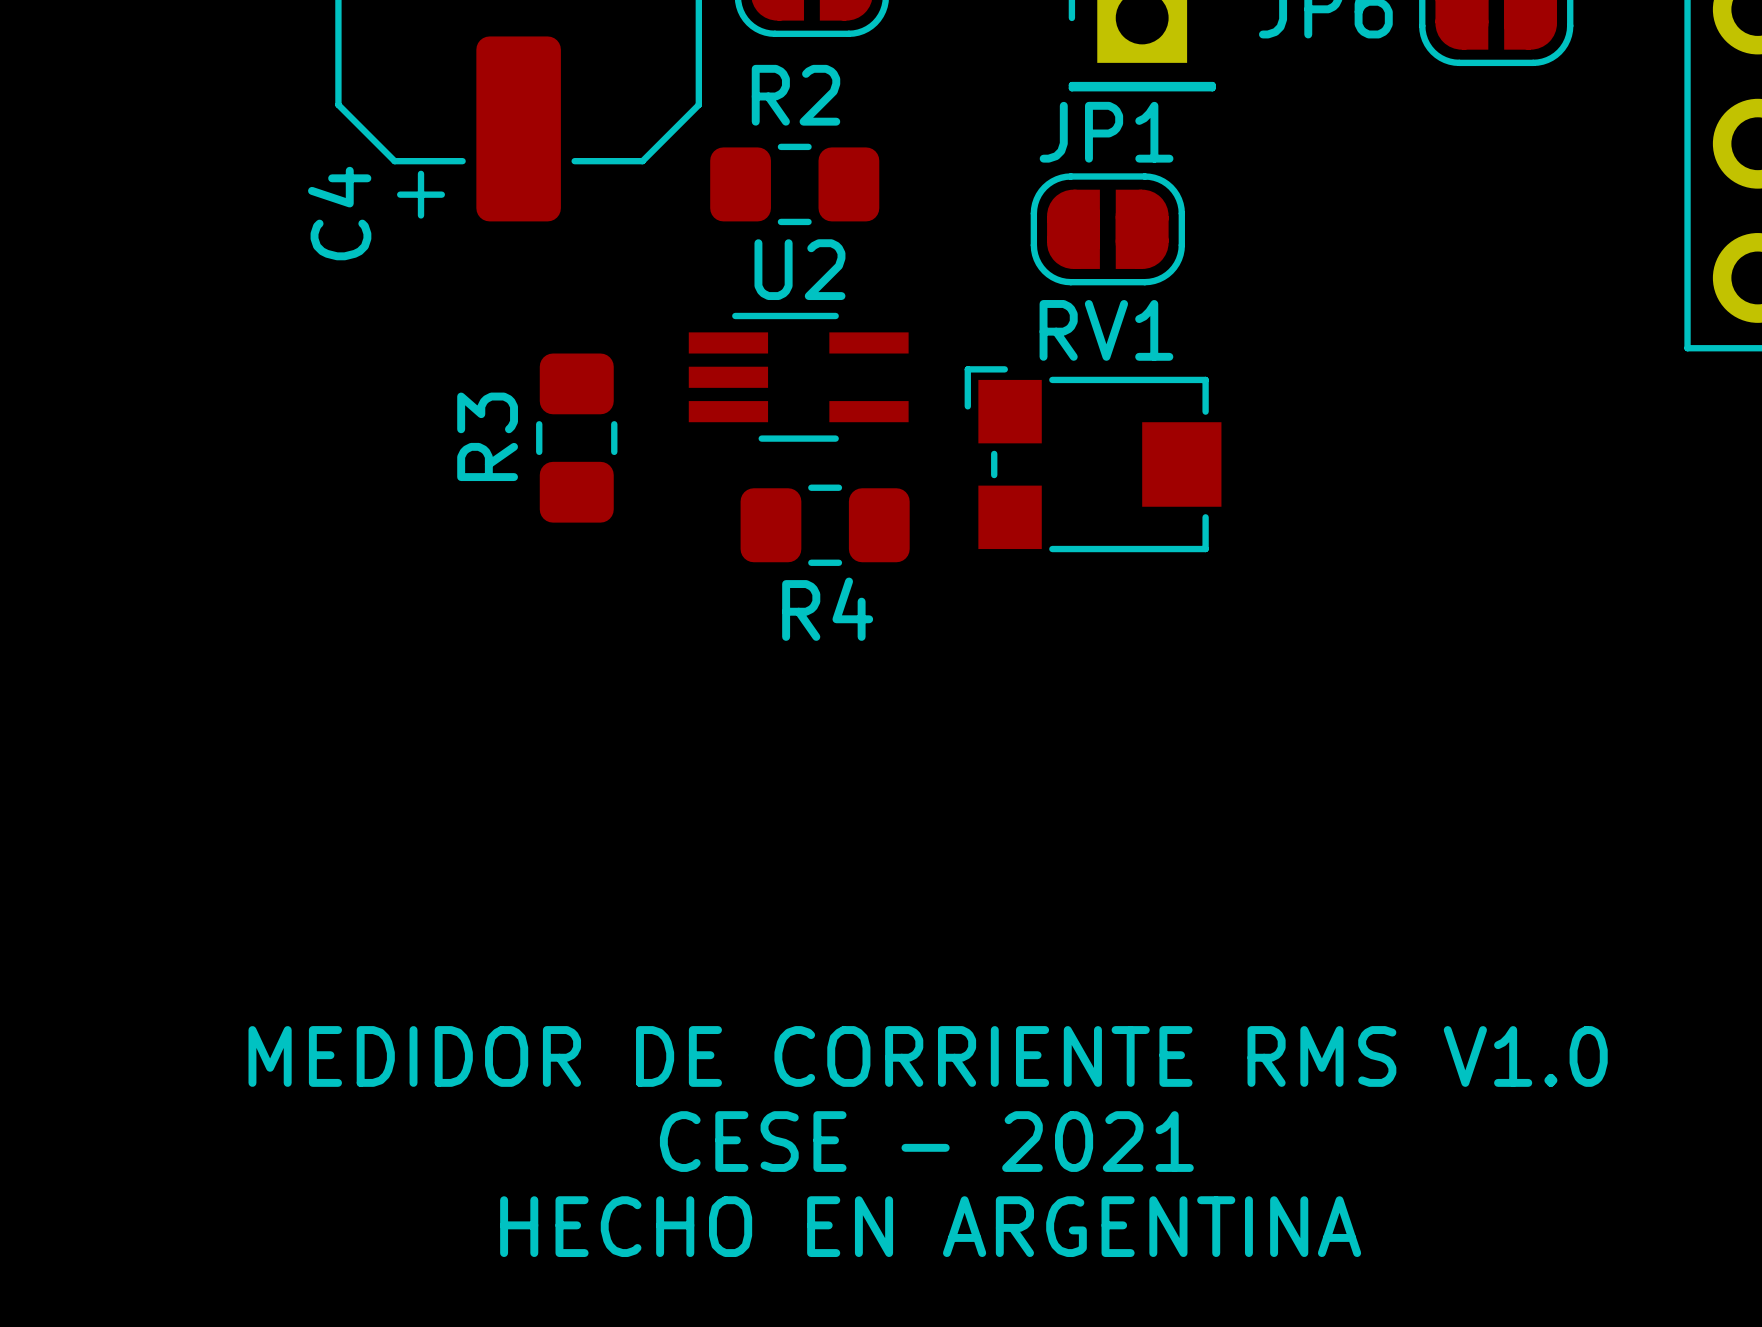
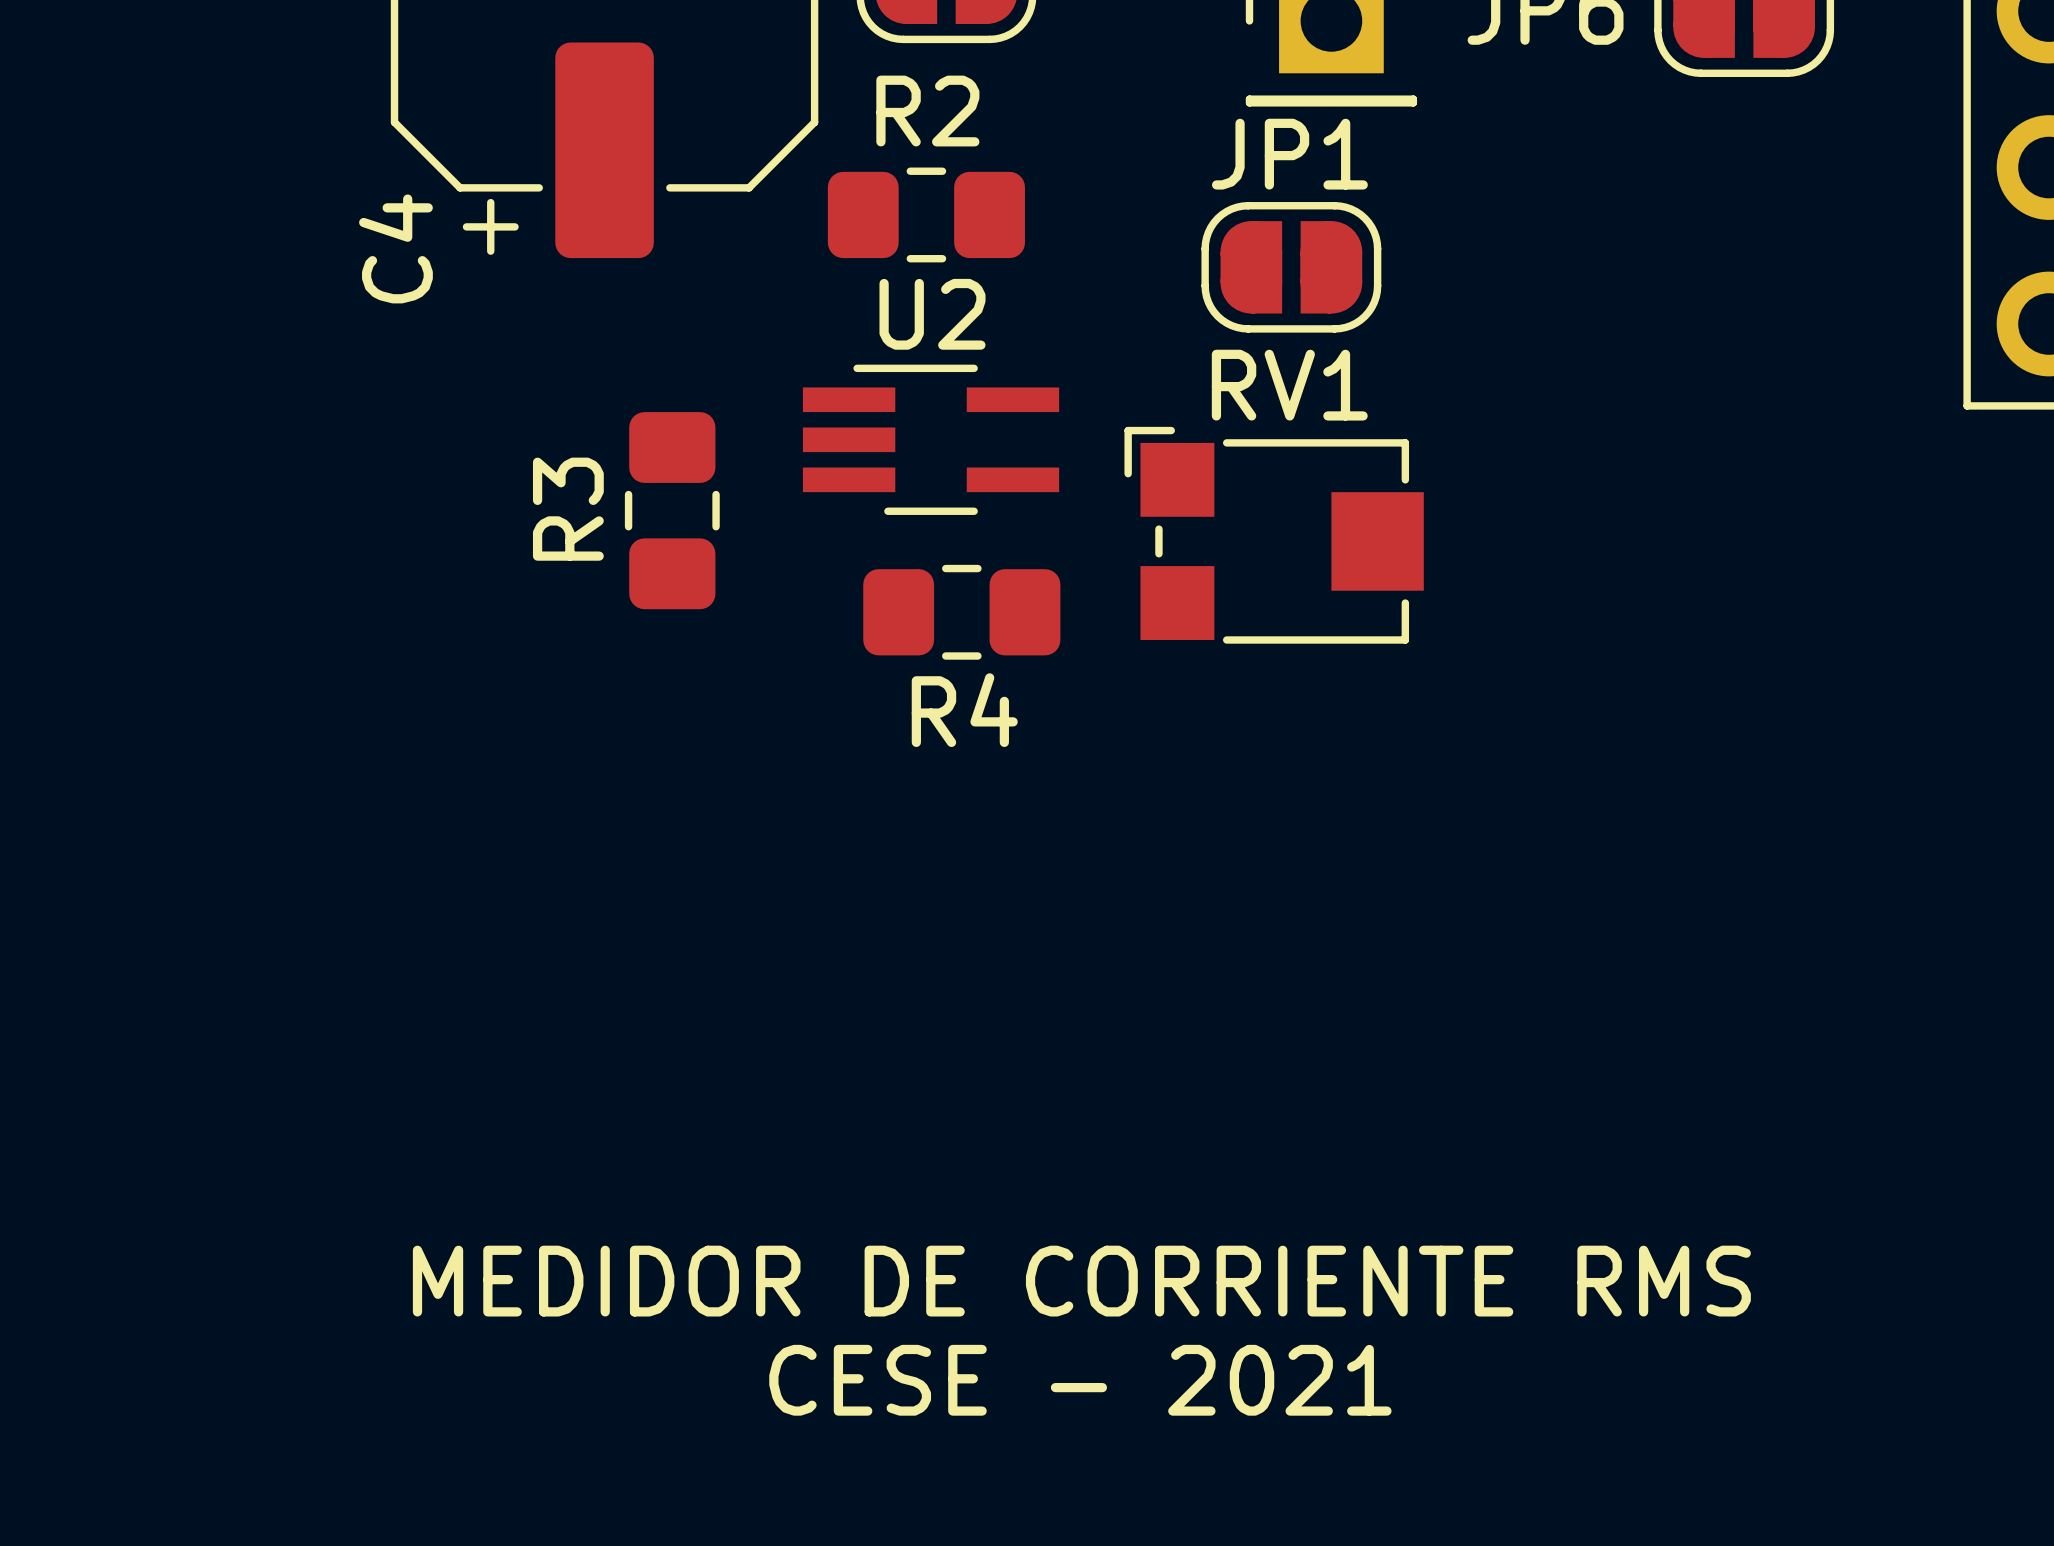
text: MEDIDOR DE CORRIENTE RMS V1.0 (928, 1056) -> MEDIDOR DE CORRIENTE RMS (1081, 1281)
text position: CESE - 2021 (926, 1141) -> CESE - 2021 (1080, 1380)
text: HECHO EN ARGENTINA (930, 1226) -> none

